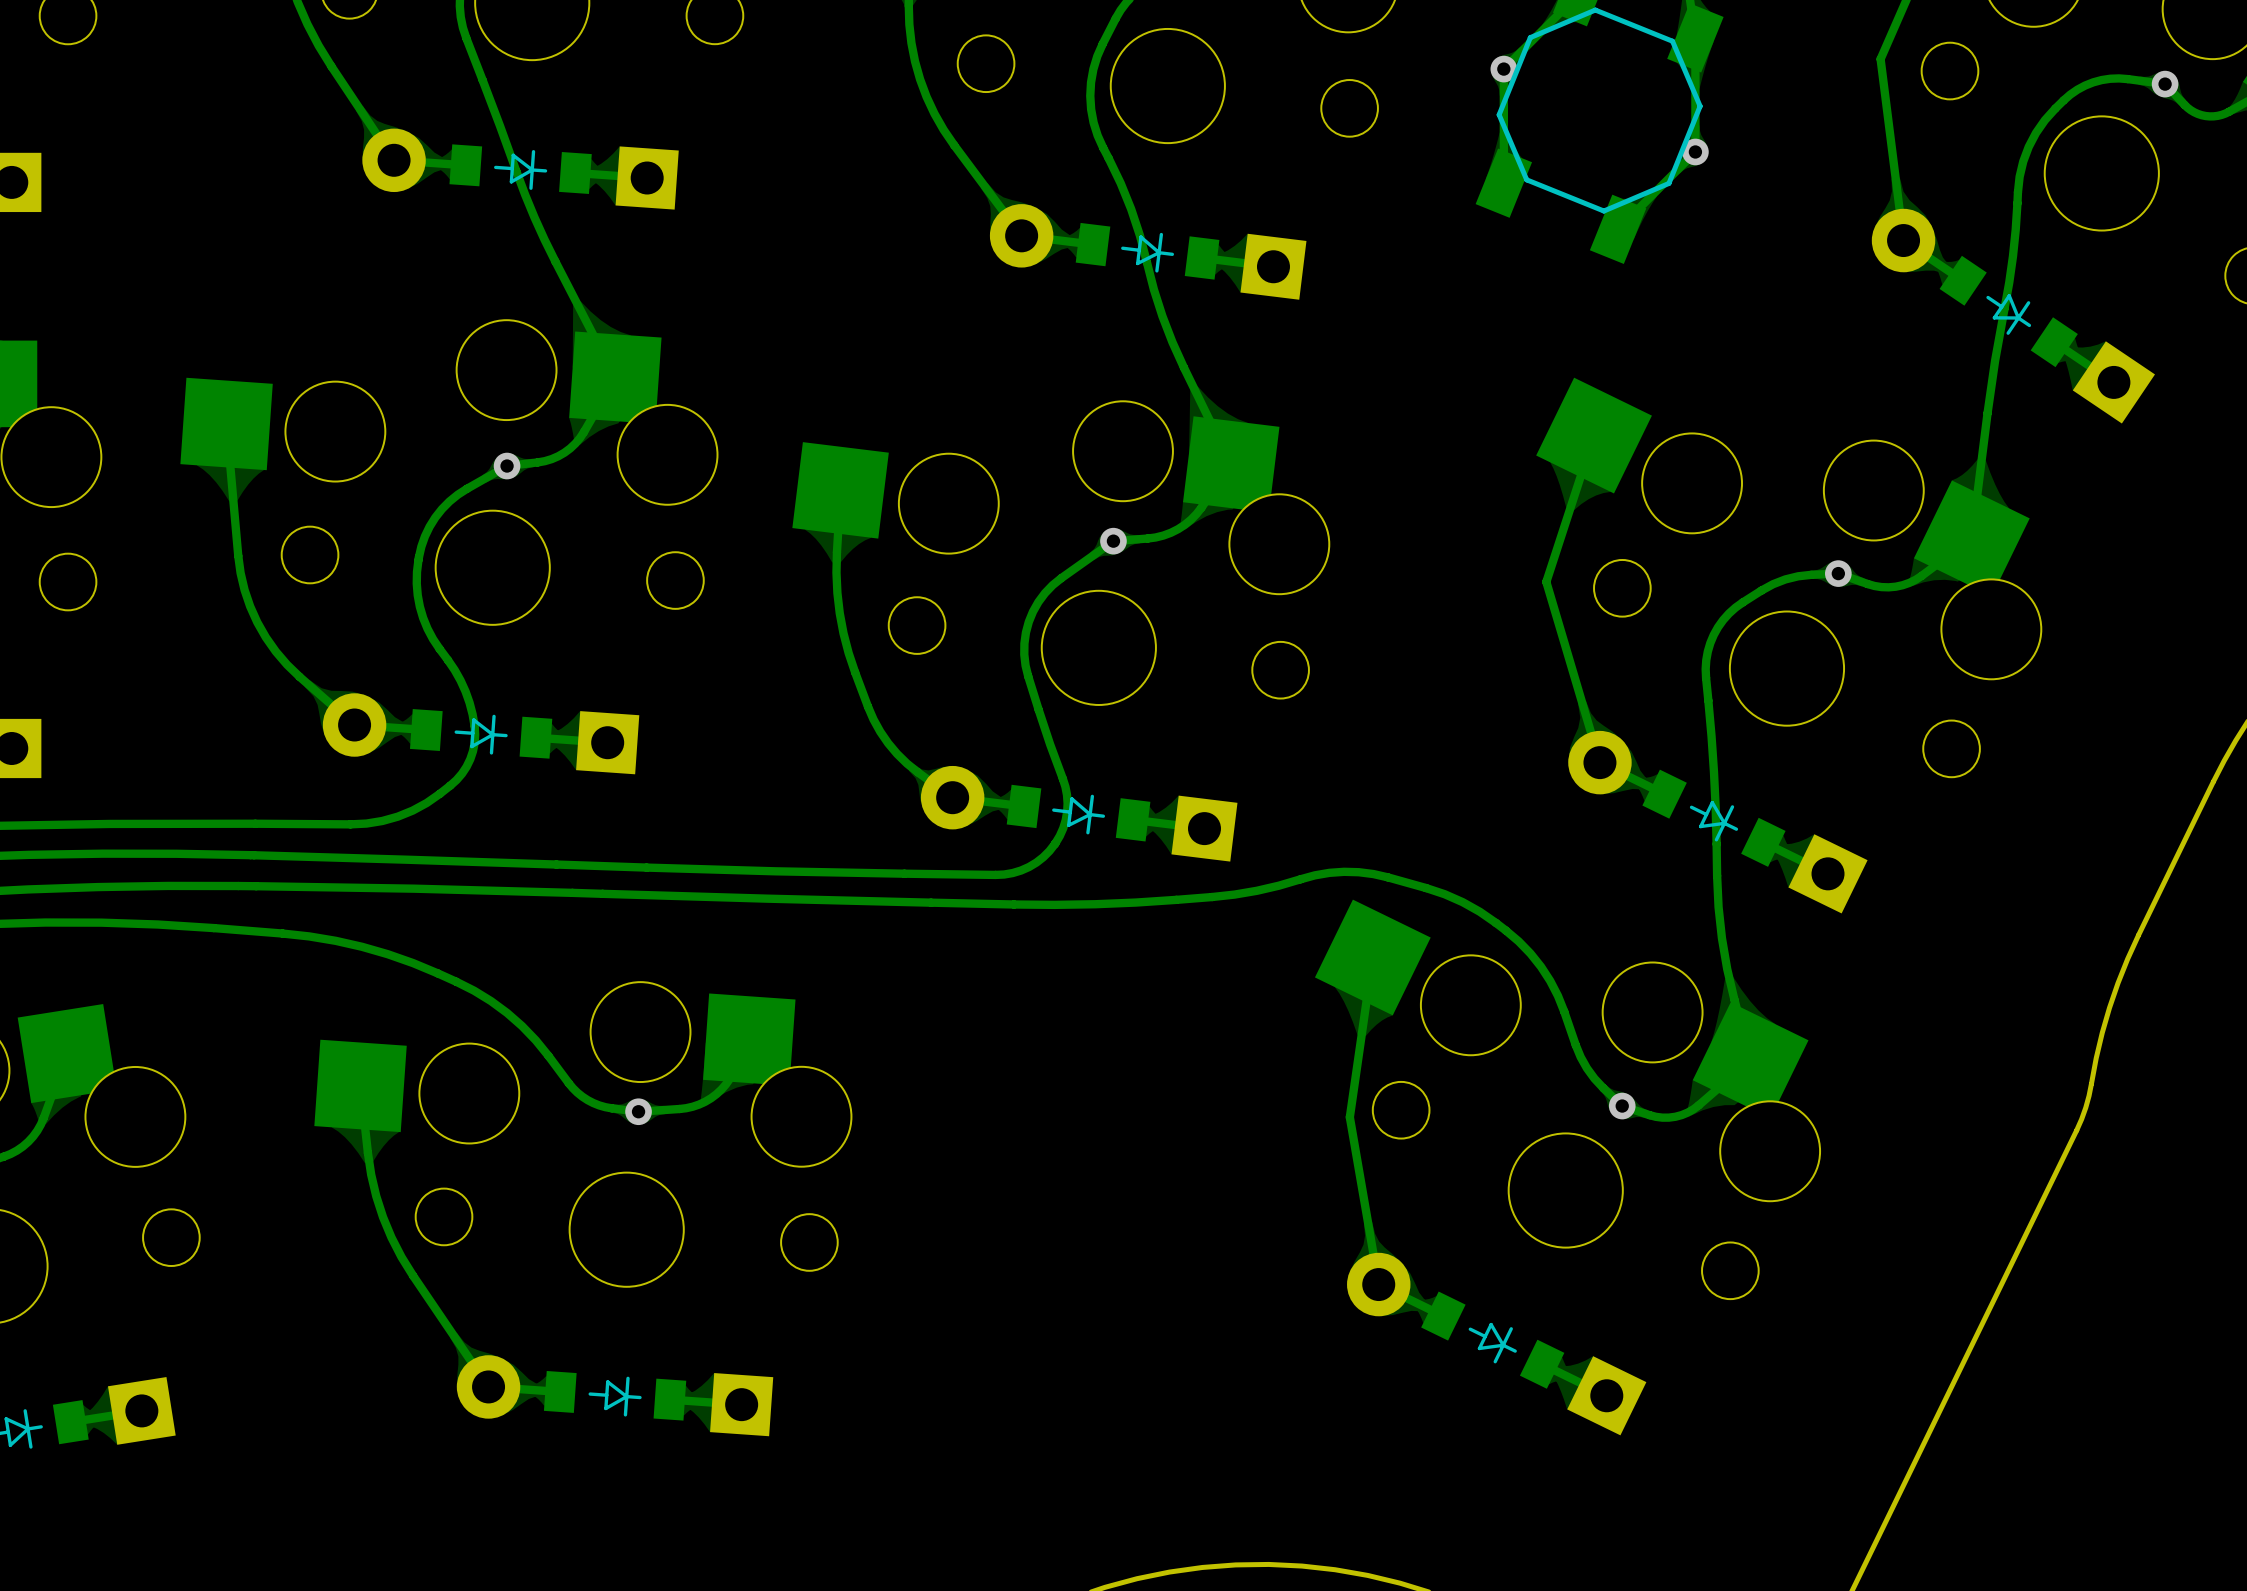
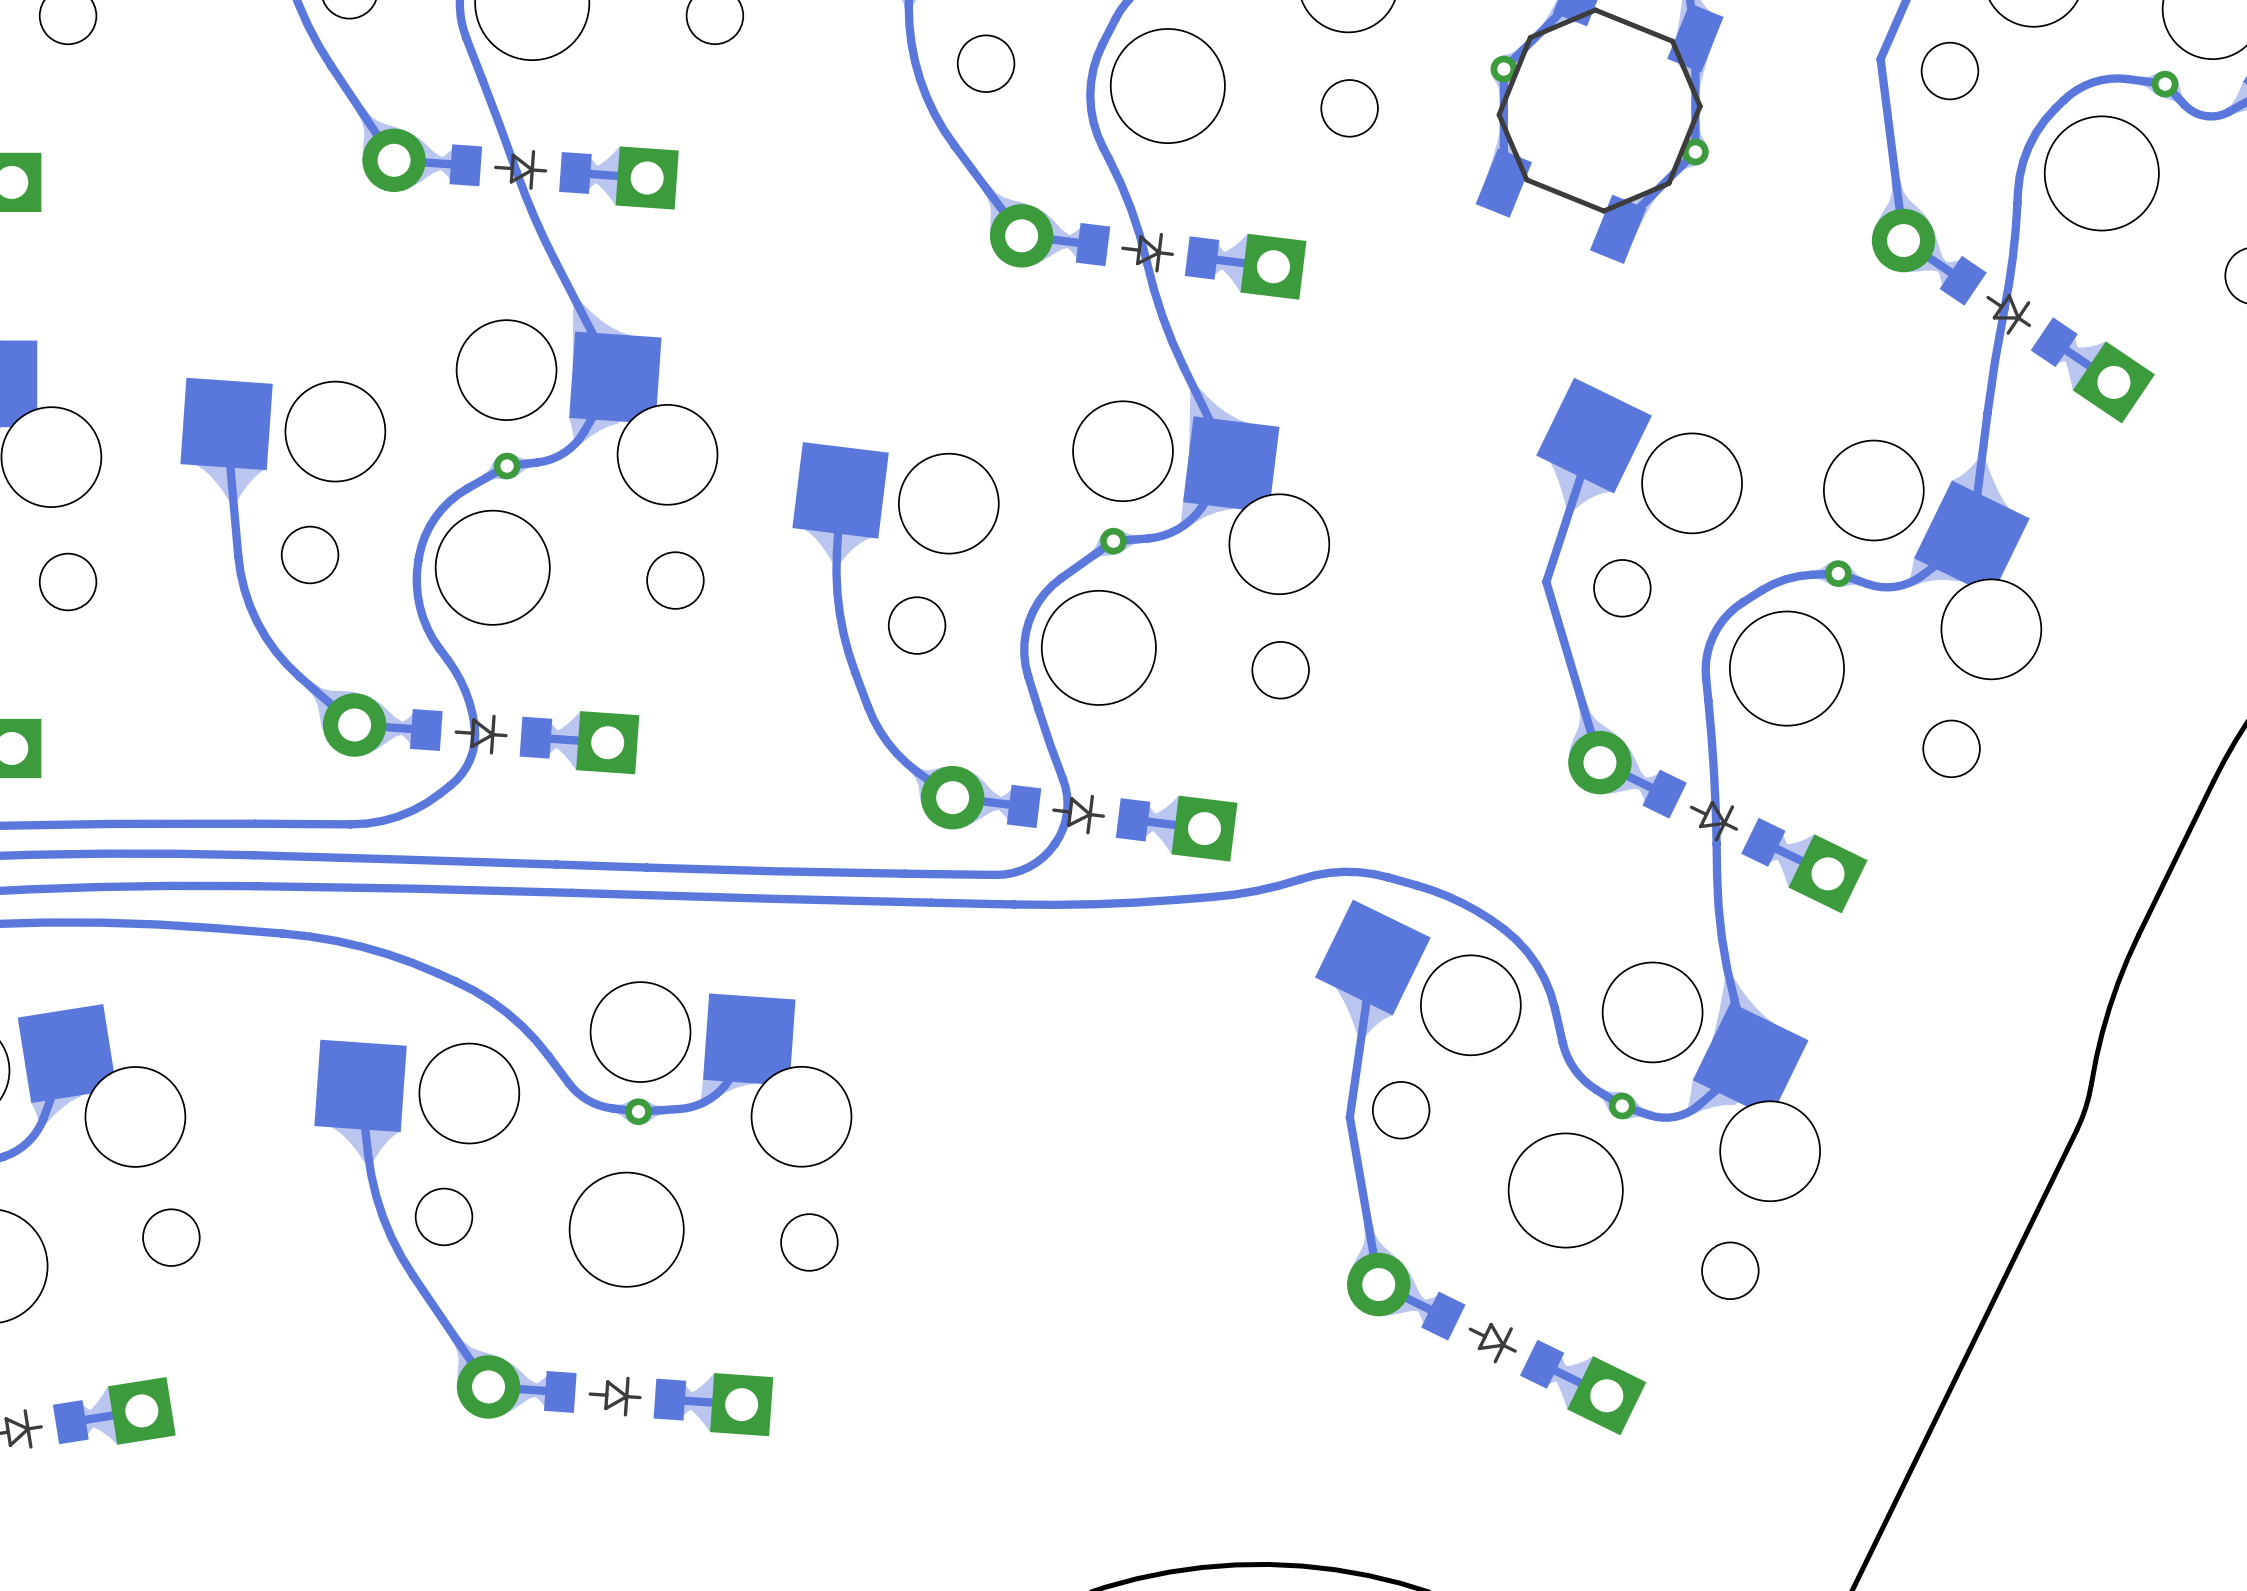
track: (1416, 885) (1444, 894) (1479, 911) (1505, 930) (1530, 953) (1550, 980) (1557, 995) (1575, 1045) (1586, 1068) (1603, 1088) (1622, 1106) -> (1416, 885) (1447, 896) (1476, 910) (1516, 939) (1527, 951) (1544, 978) (1554, 1008) (1564, 1049) (1570, 1063) (1589, 1085) (1622, 1106)

